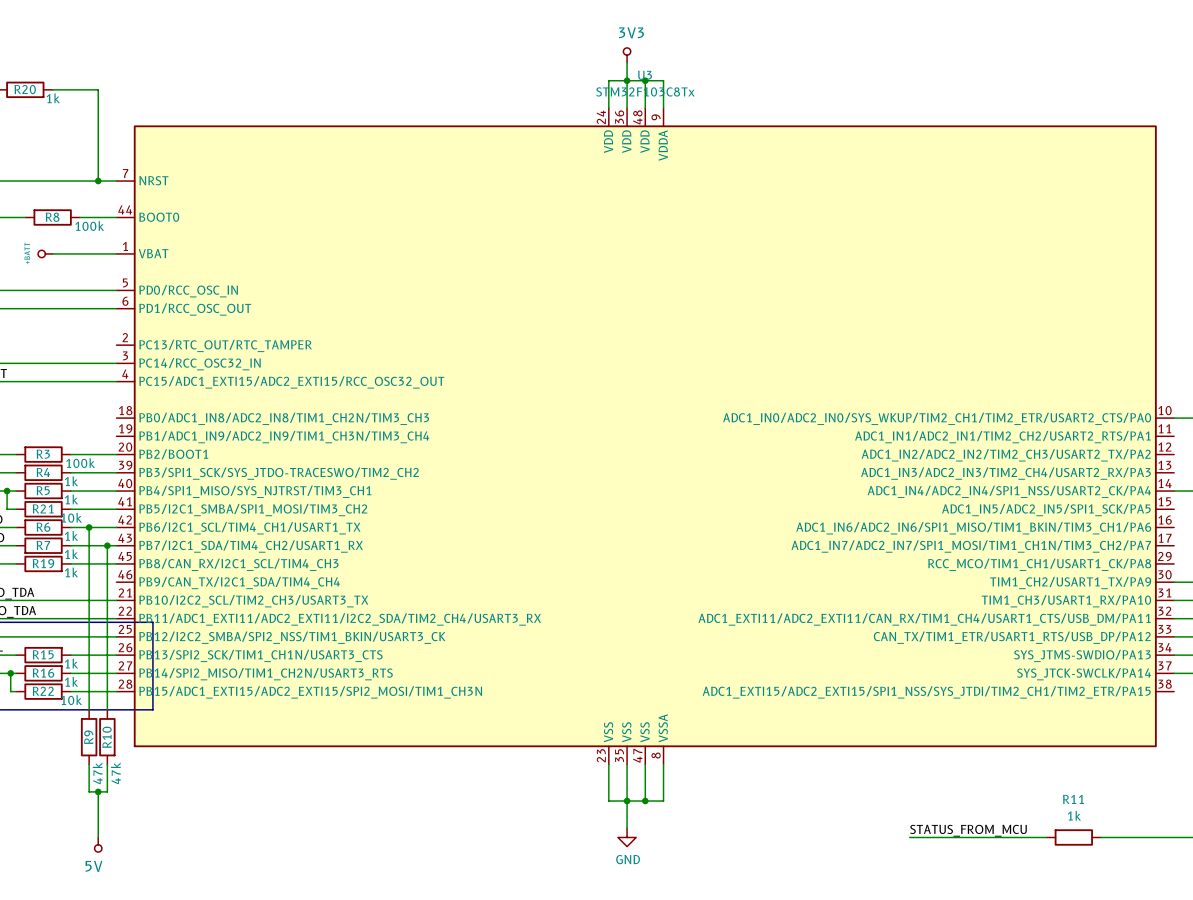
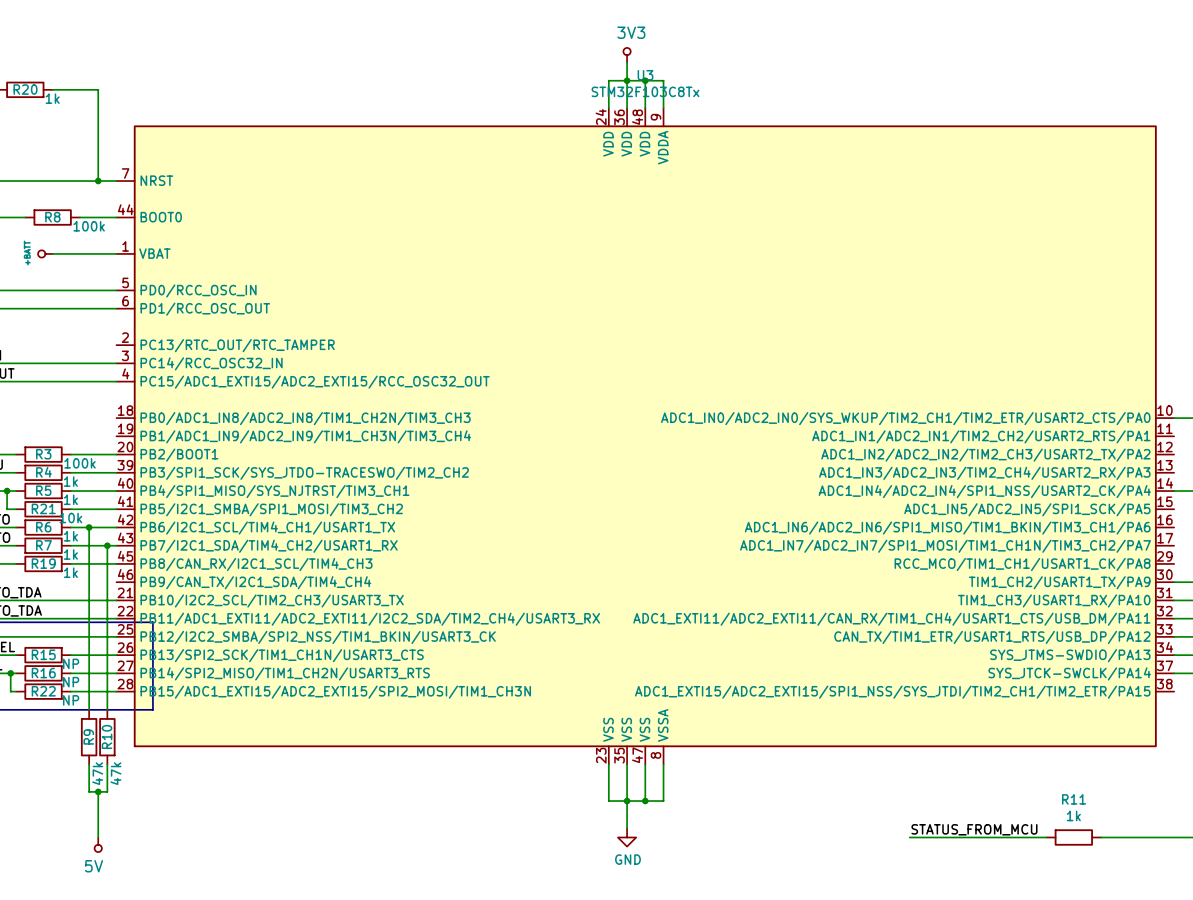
R15 value: 1k (71, 663) -> NP (71, 663)
R16 value: 1k (71, 681) -> NP (71, 682)
R22 value: 10k (71, 700) -> NP (71, 700)

